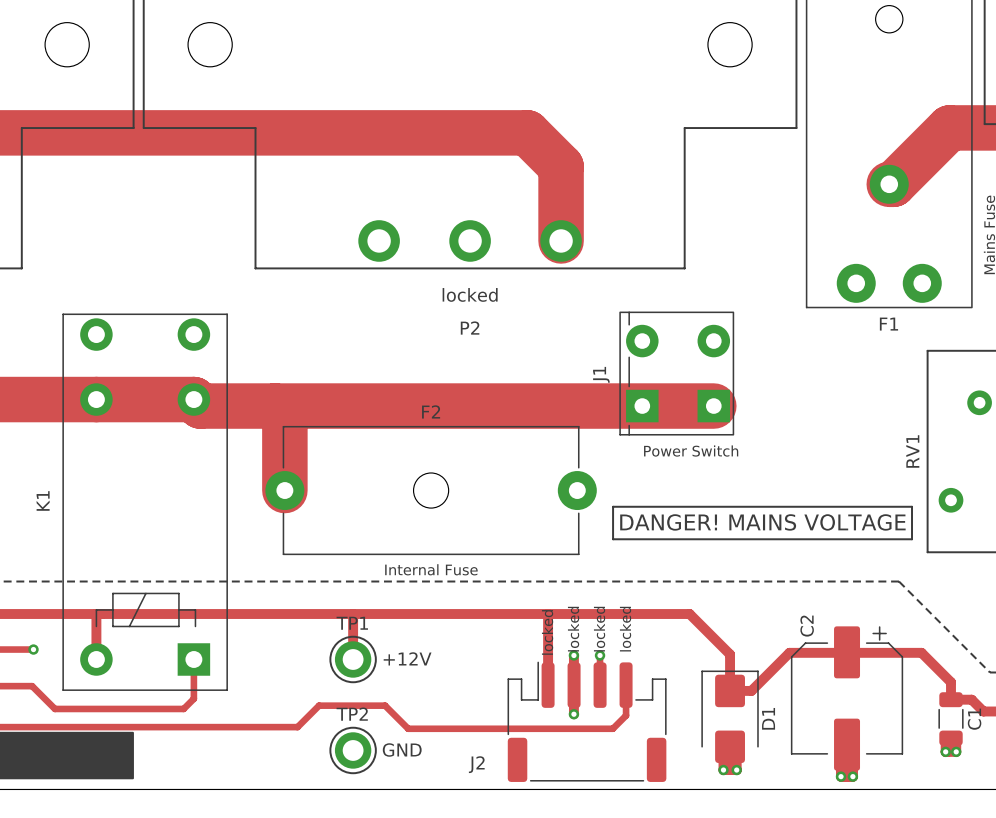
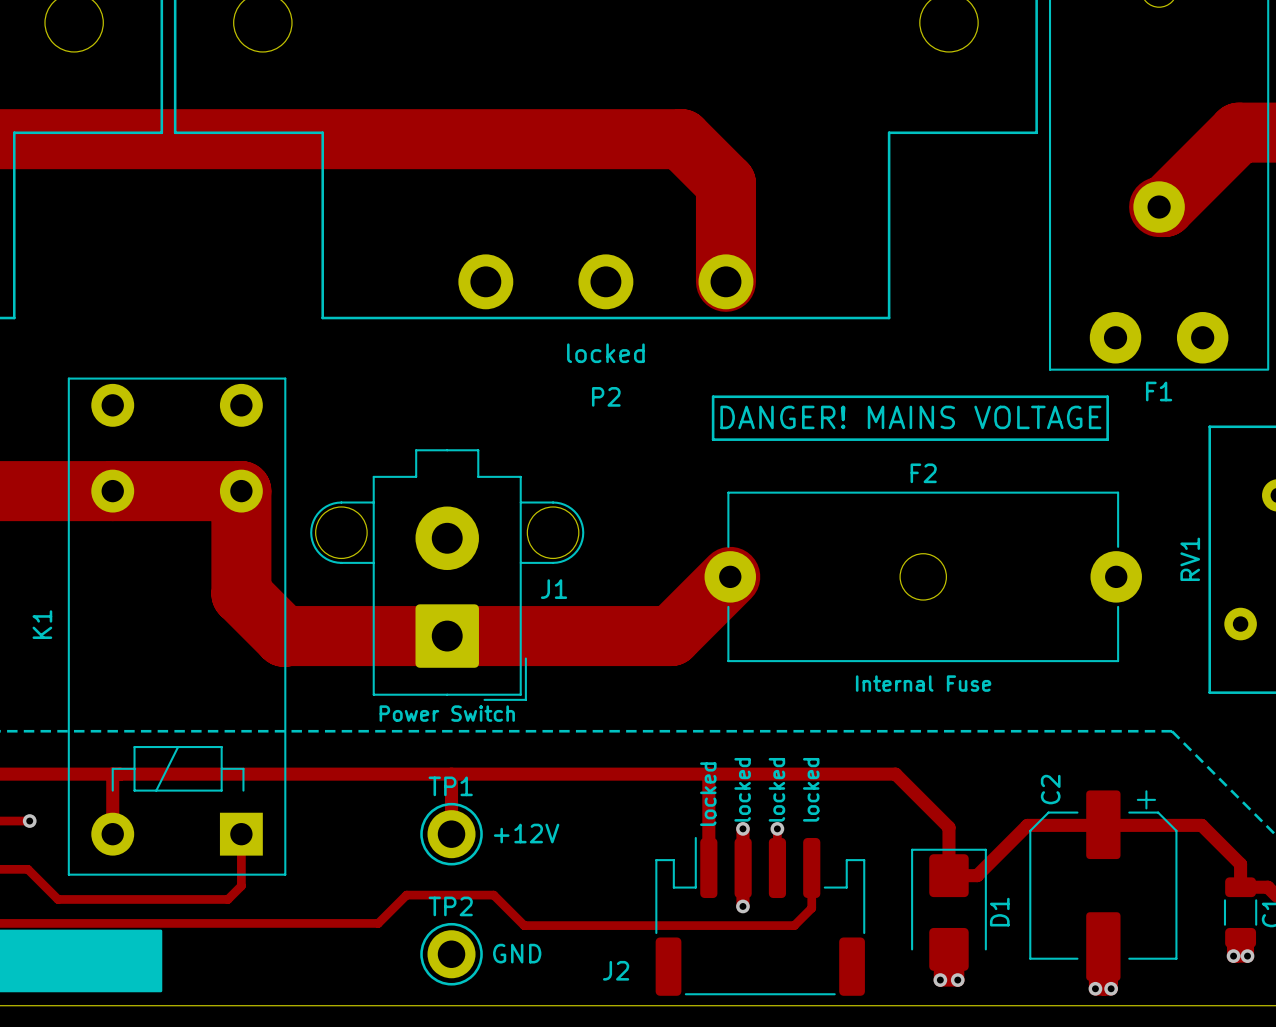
J1 footprint: [619, 311, 735, 436] -> [310, 449, 585, 701]
J1 name position: J1 (601, 374) -> J1 (554, 589)
track: (193, 399) (200, 406) (713, 406) -> (241, 491) (241, 594) (284, 636) (671, 636) (730, 576)
track: (275, 406) (284, 415) (284, 490) -> none
text: Power Switch (691, 451) -> none
F2 position: (431, 490) -> (923, 576)
line: (613, 506) (912, 506) (912, 539) (613, 539) (613, 506) -> (713, 396) (1107, 396) (1107, 439) (713, 439) (713, 396)
text position: DANGER! MAINS VOLTAGE (762, 522) -> DANGER! MAINS VOLTAGE (910, 417)
text: none -> Power Switch (447, 713)
text position: Internal Fuse (431, 569) -> Internal Fuse (923, 683)

